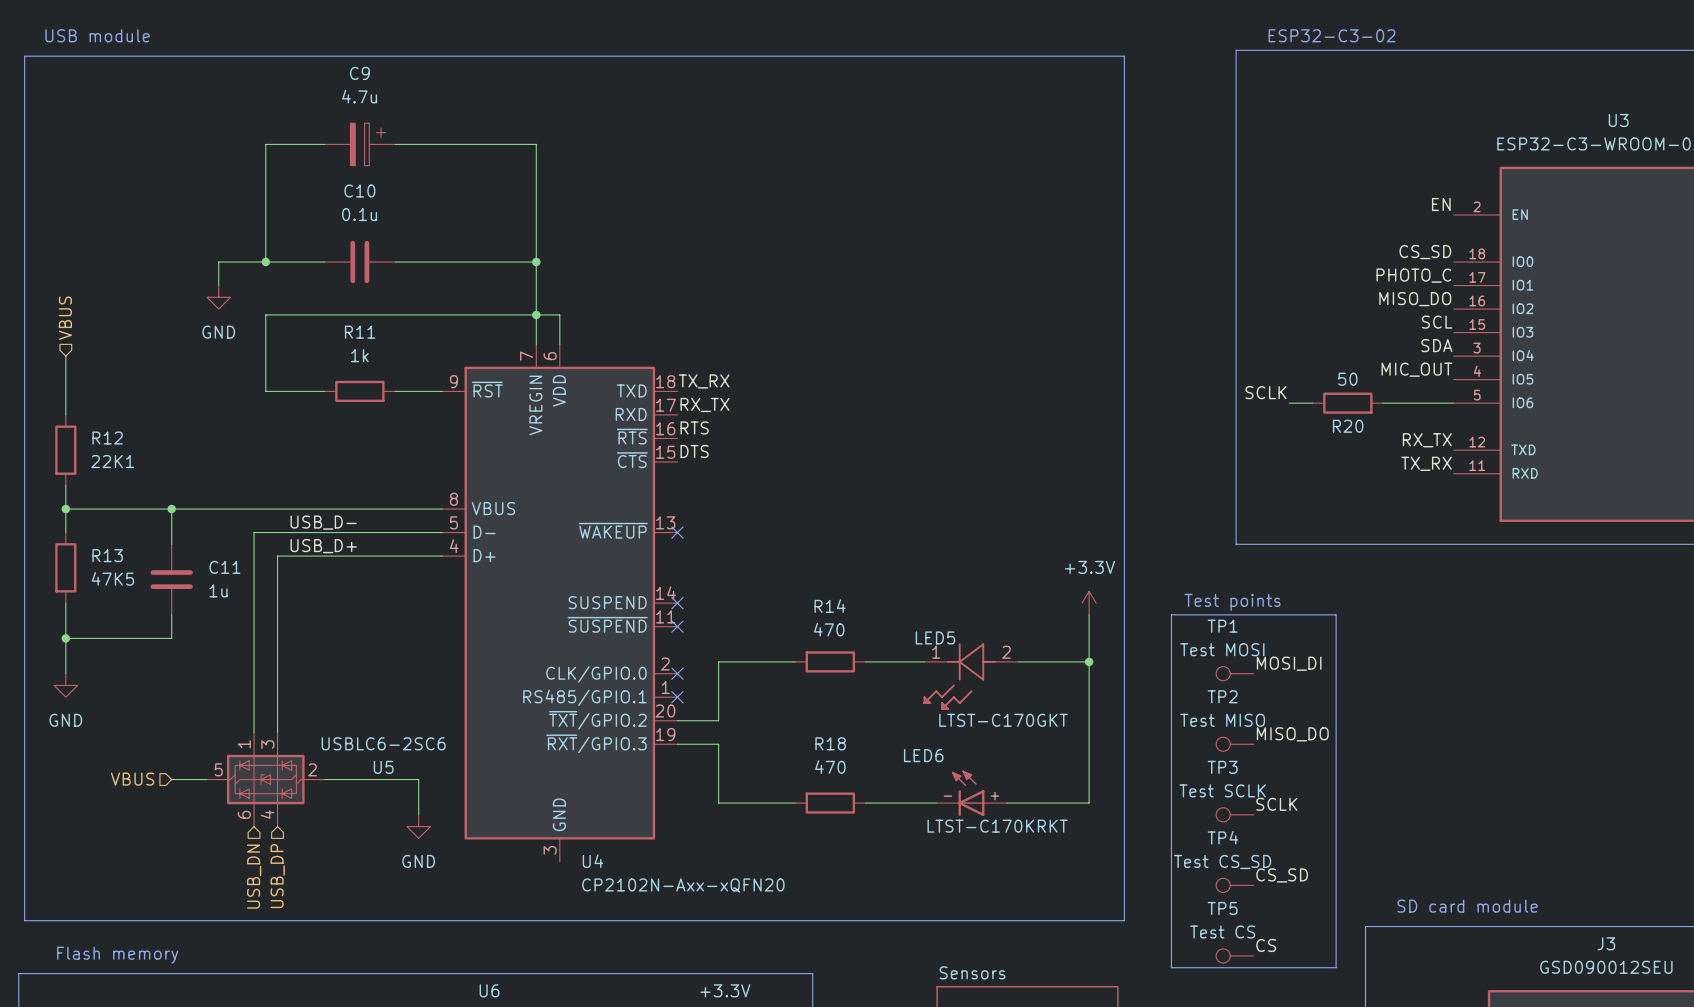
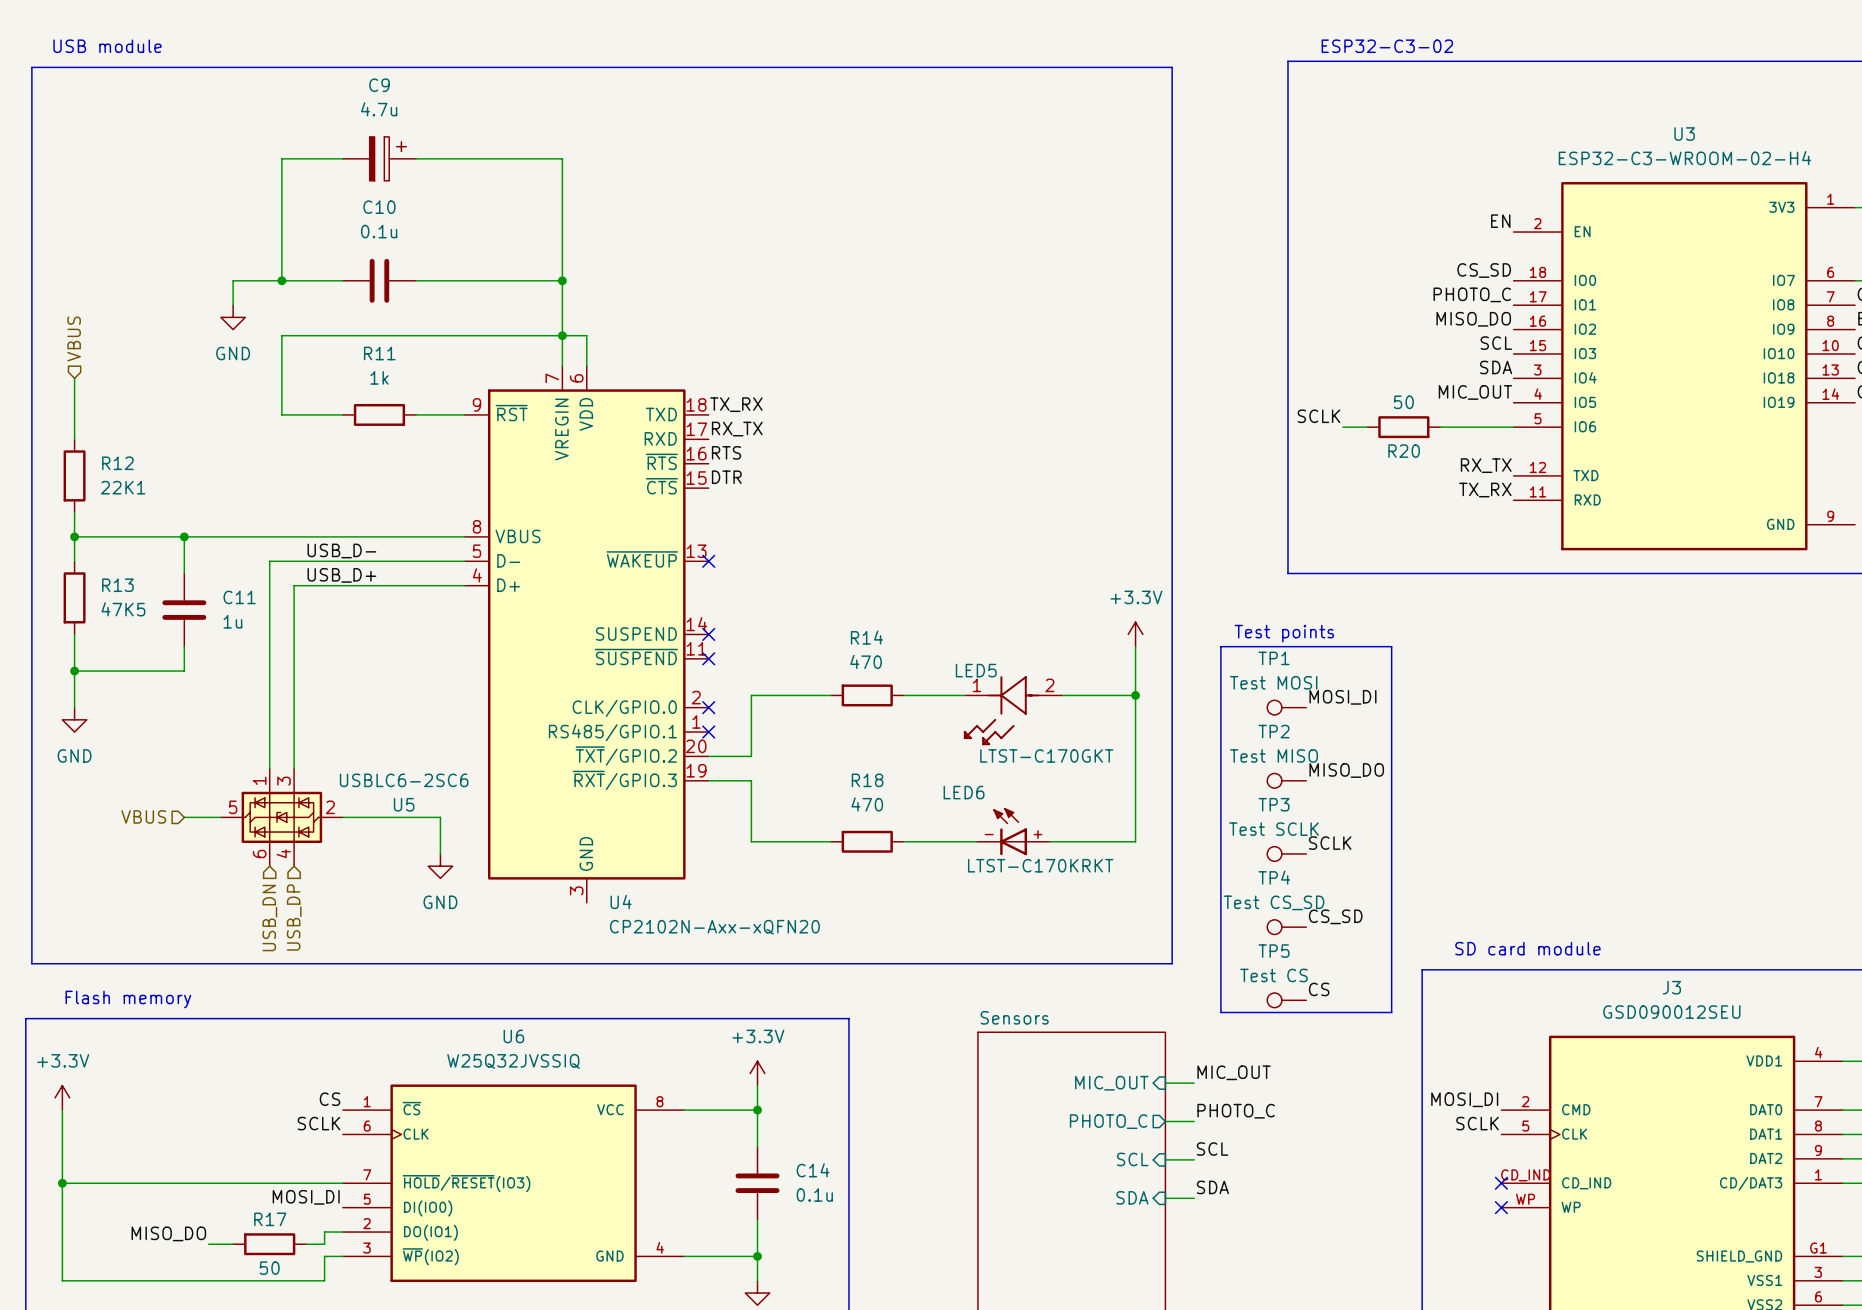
label: DTS (694, 451) -> DTR (726, 477)

